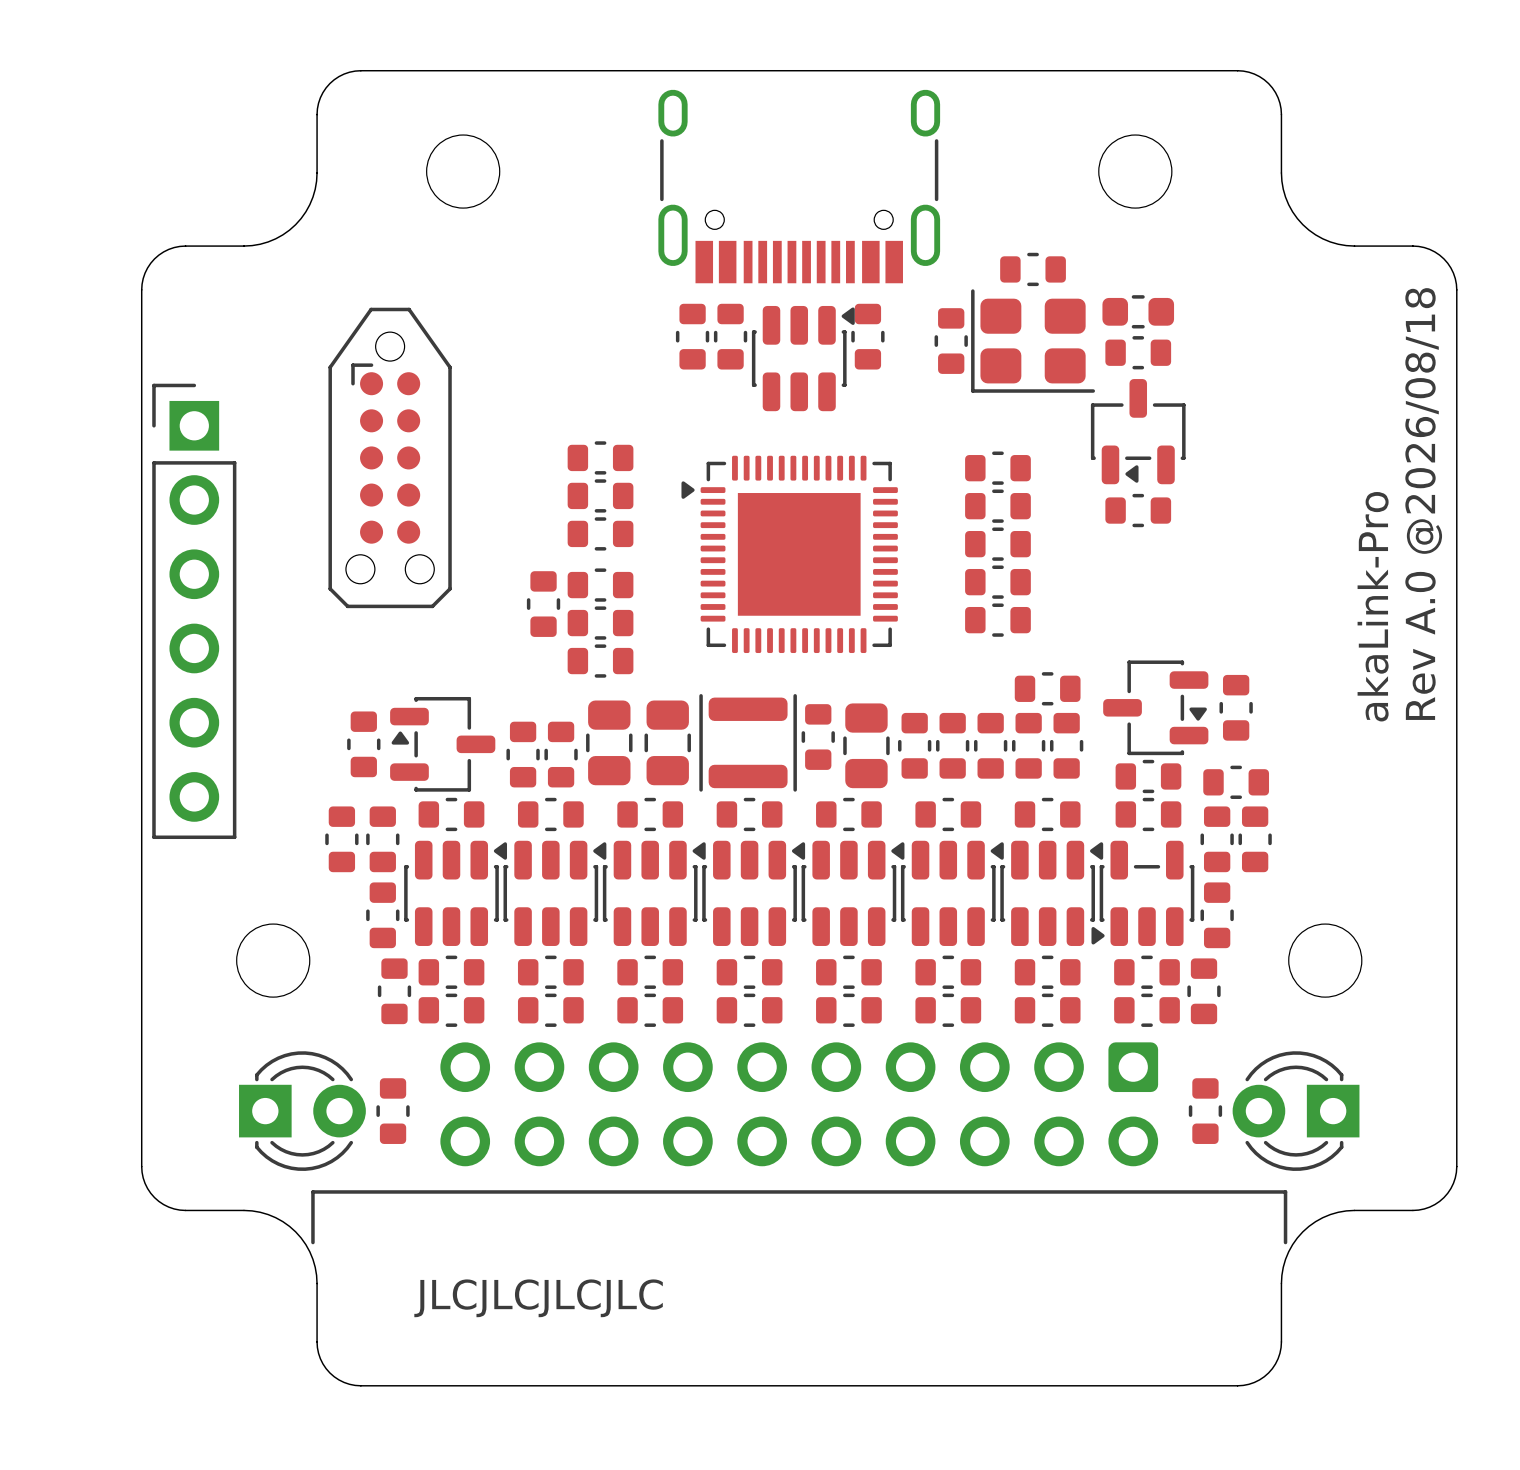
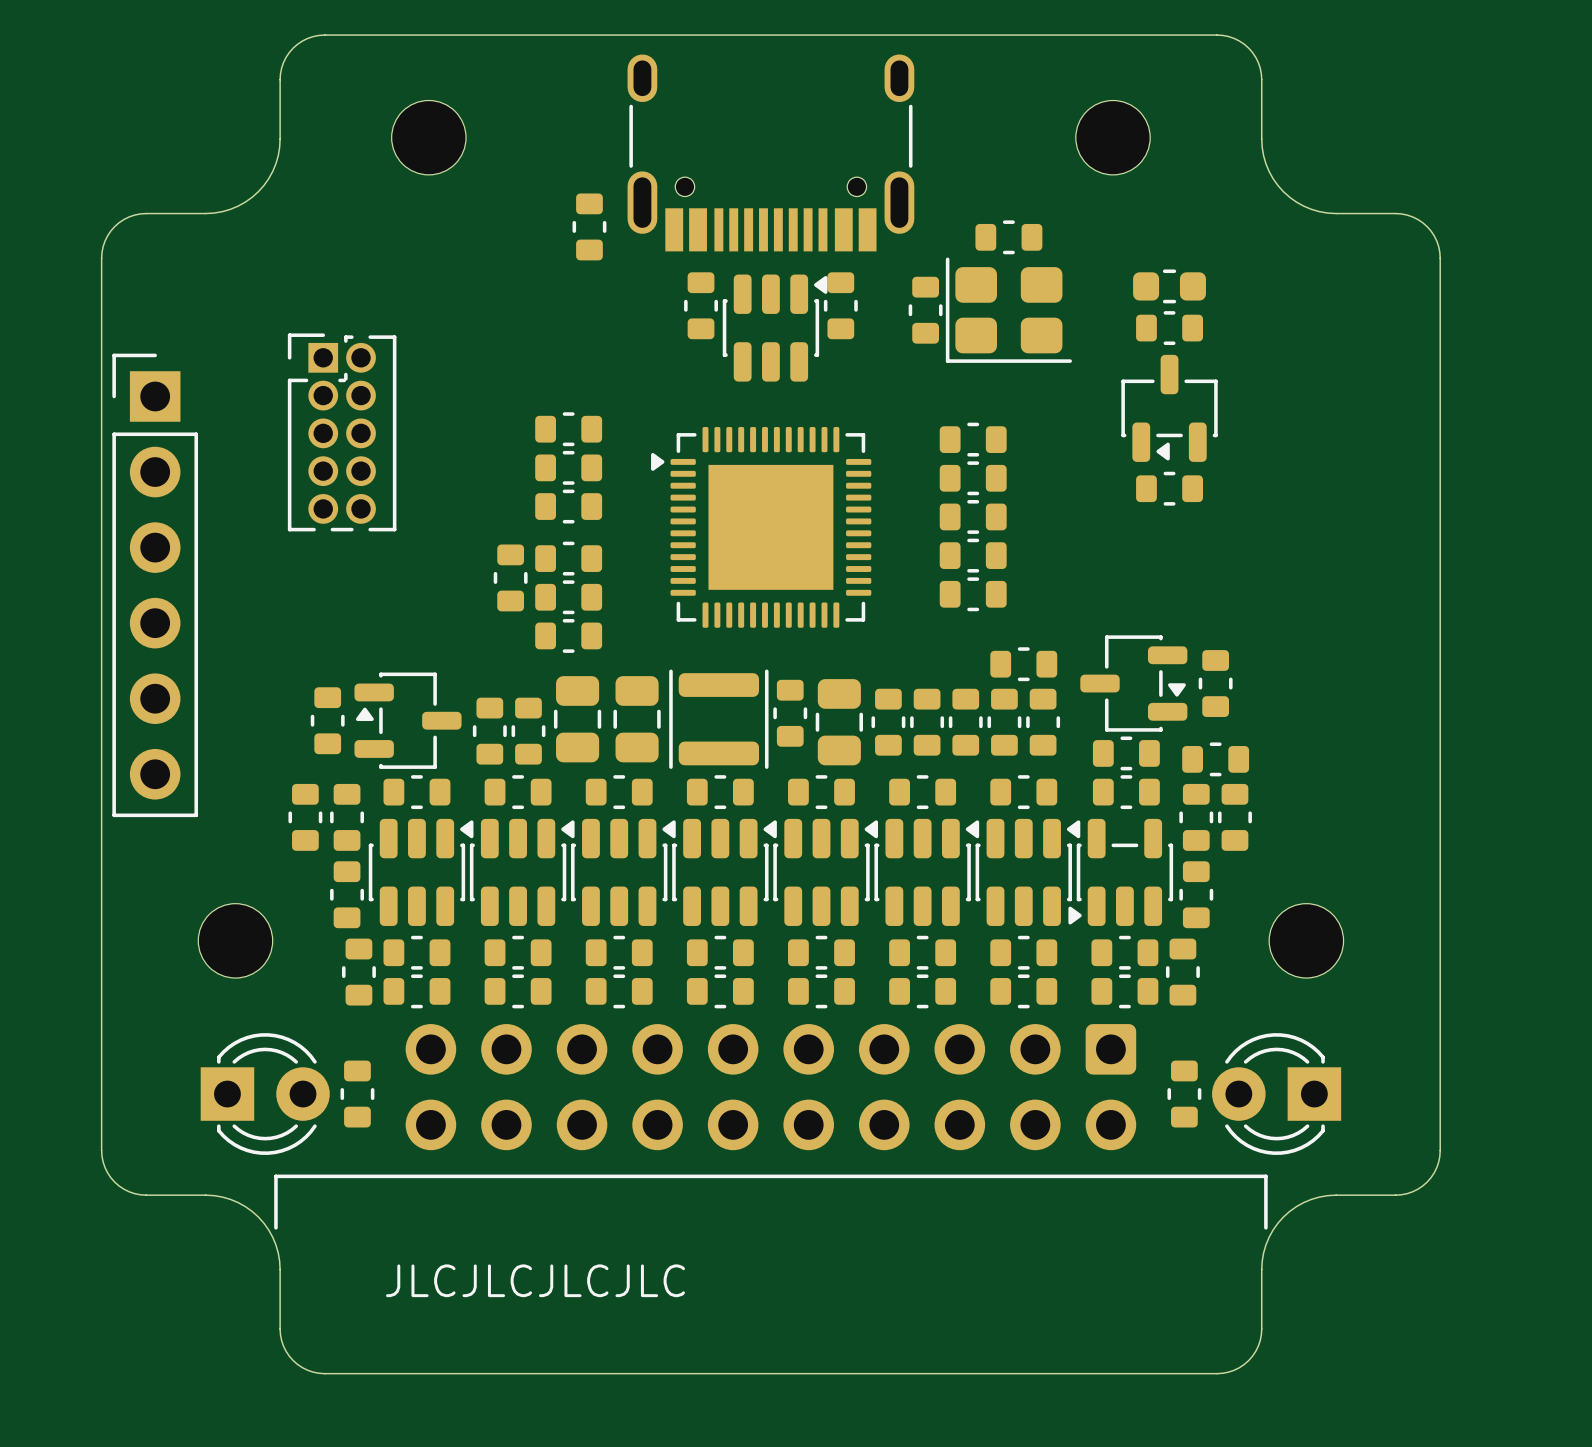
part footprint: [328, 307, 452, 609] -> [287, 333, 397, 532]
part position: (1138, 311) -> (1169, 286)
part position: (692, 336) -> (589, 226)
part position: (1138, 352) -> (1169, 328)
part position: (1138, 431) -> (1169, 408)
text: Rev A.0 @2026/08/18 (1423, 504) -> none
part position: (1138, 510) -> (1169, 488)
text: akaLink-Pro (1373, 606) -> none

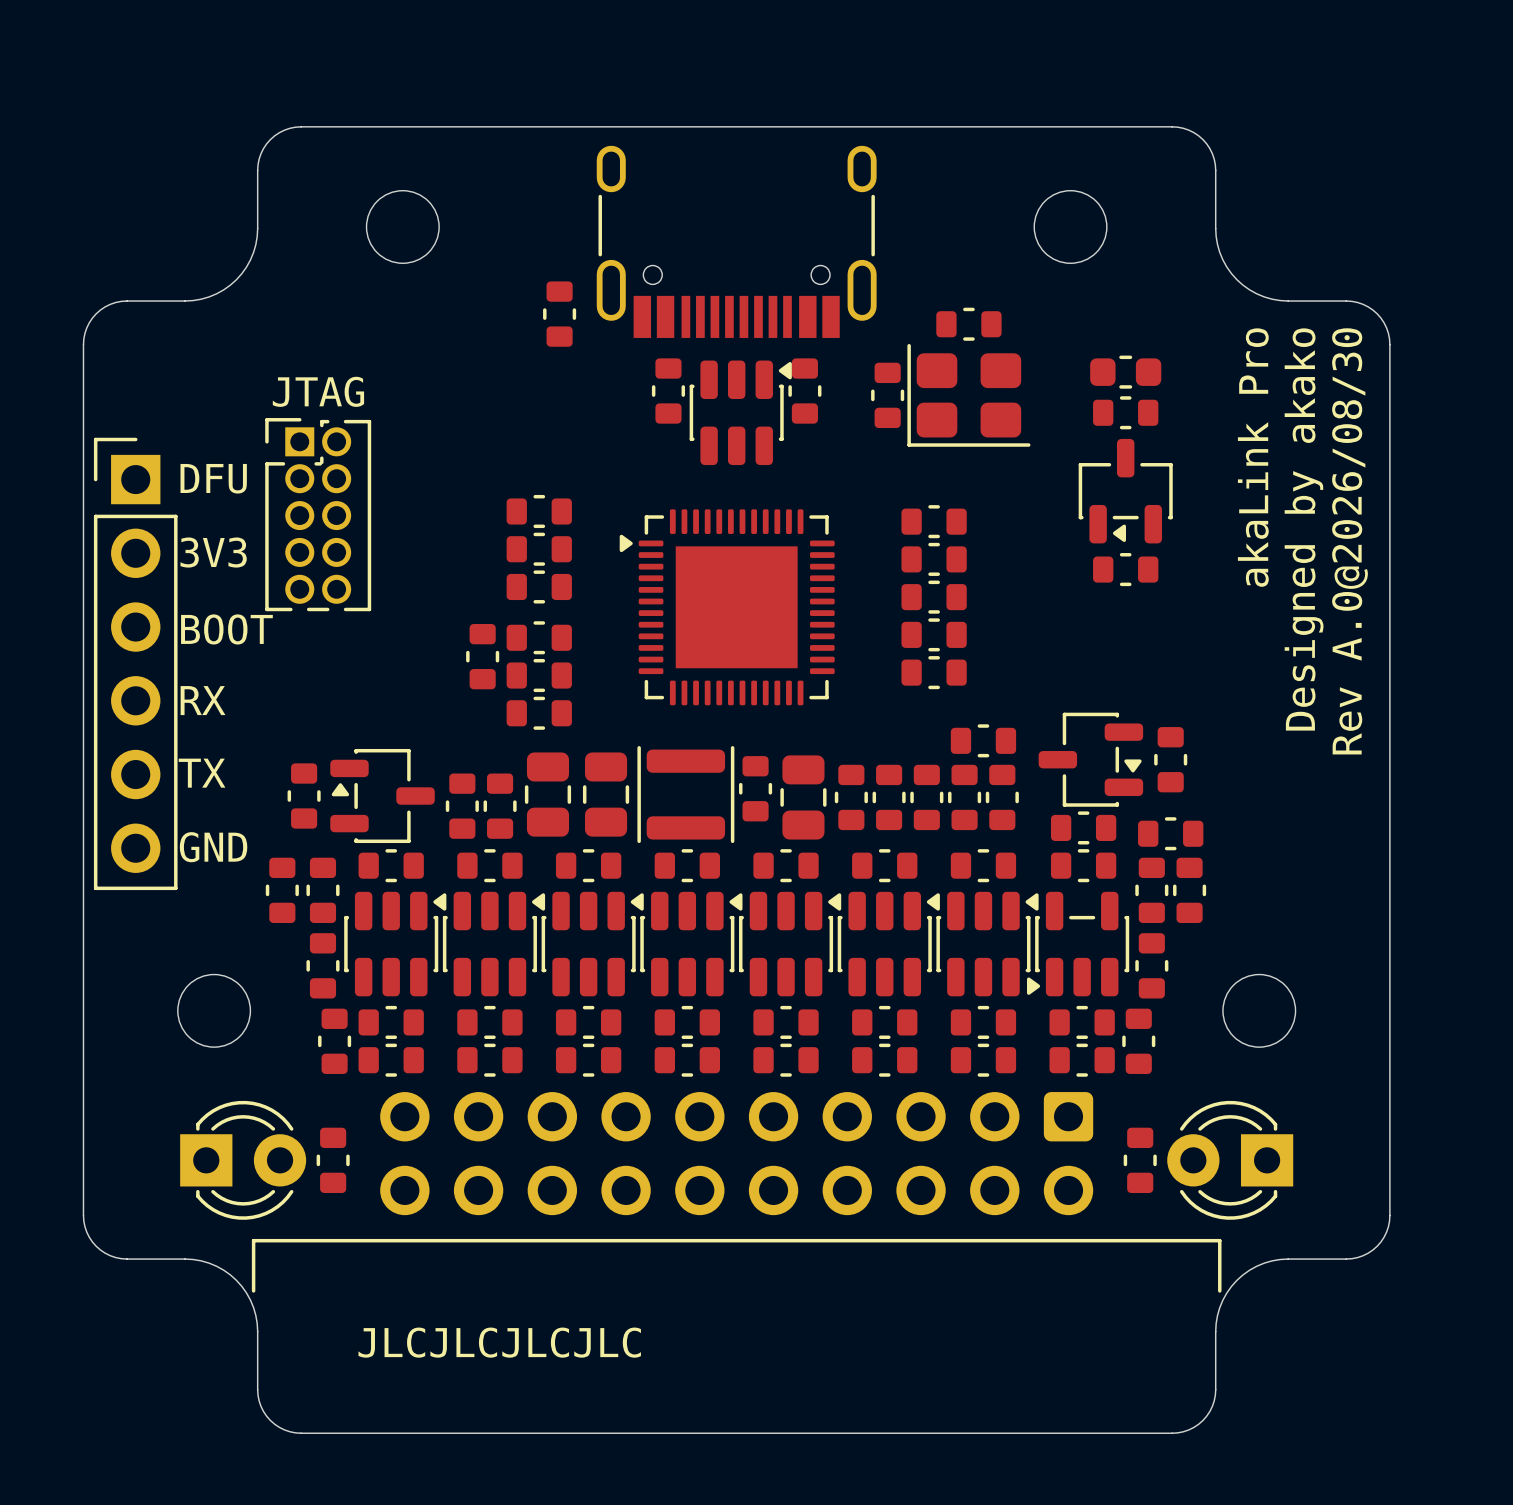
text: none -> JTAG (318, 391)
text: none -> akaLink Pro (1253, 457)
text: none -> DFU (213, 478)
text: none -> Designed by akako (1304, 529)
text: none -> 3V3 (213, 552)
text: none -> Rev A.0@2026/08/30 (1349, 541)
text: none -> BOOT (226, 629)
text: none -> RX (203, 700)
text: none -> TX (202, 773)
text: none -> GND (213, 847)

